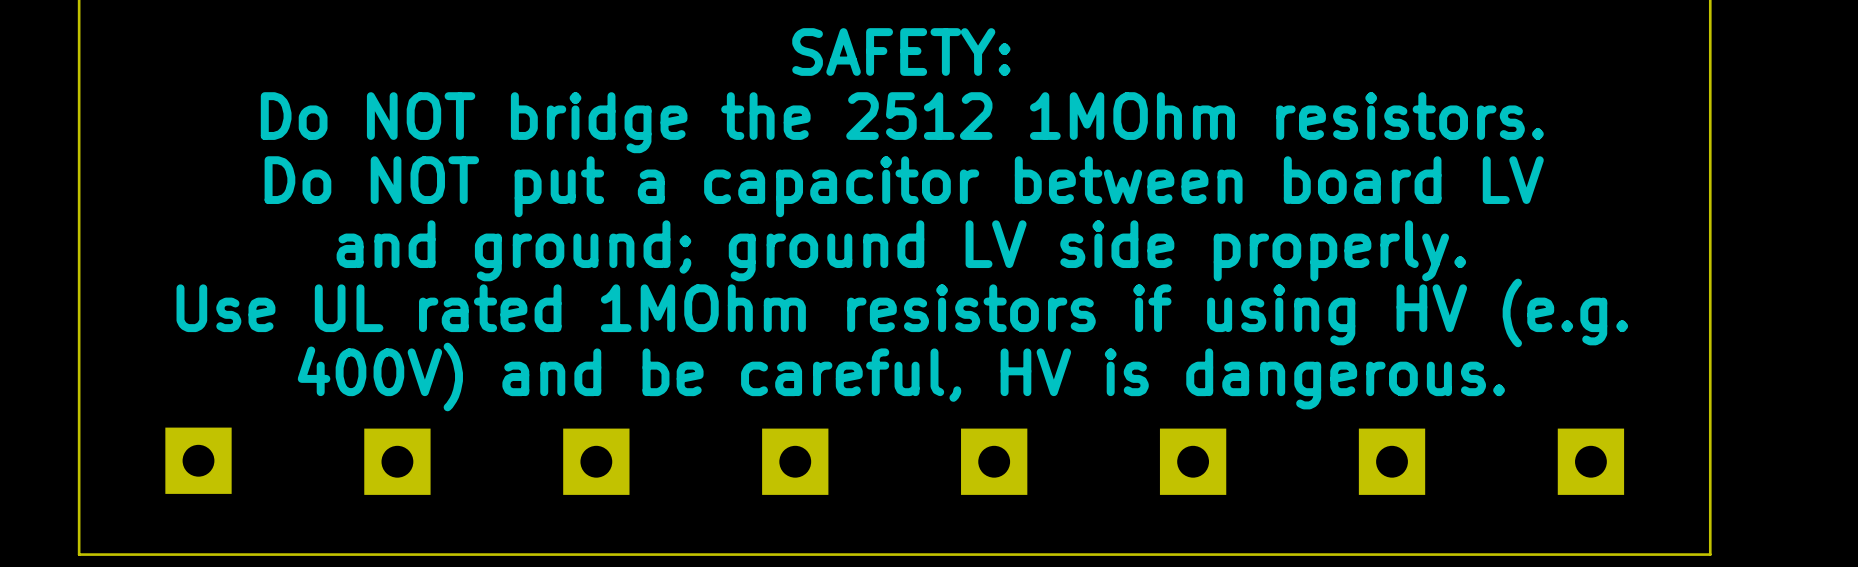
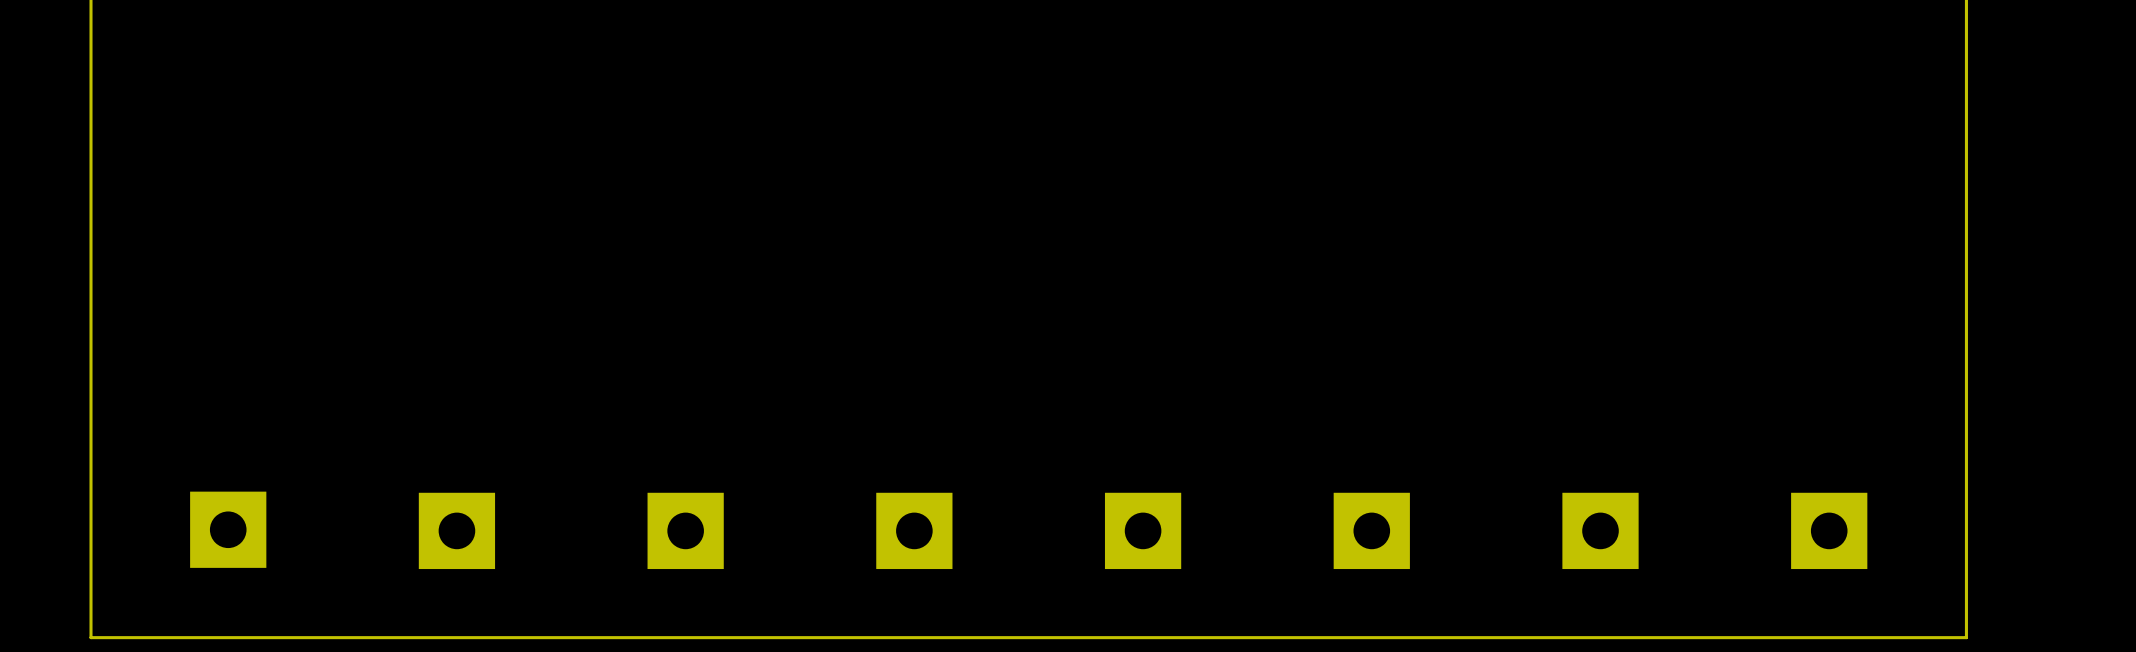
text: SAFETY: (901, 52) -> none
text: Do NOT bridge the 2512 1MOhm resistors. (902, 122) -> none
text: Do NOT put a capacitor between board LV (904, 186) -> none
text: and ground; ground LV side properly. (901, 250) -> none
text: Use UL rated 1MOhm resistors if using HV (e.g. (902, 312) -> none
text: 400V) and be careful, HV is dangerous. (901, 377) -> none

